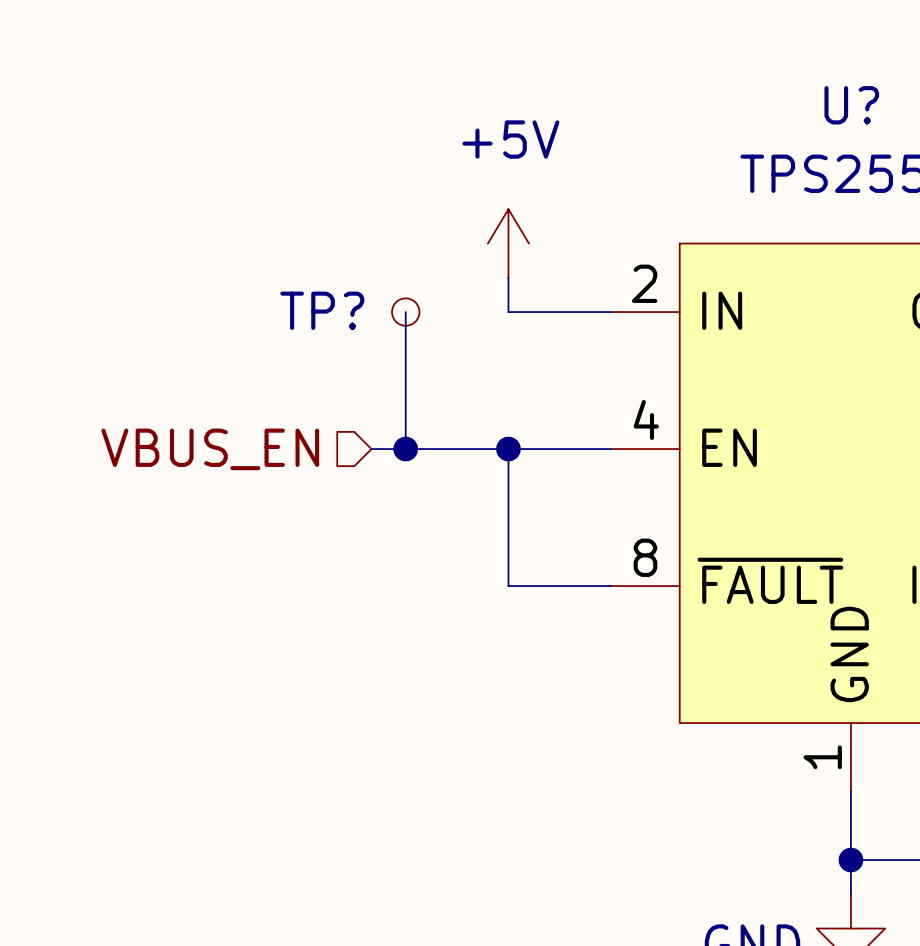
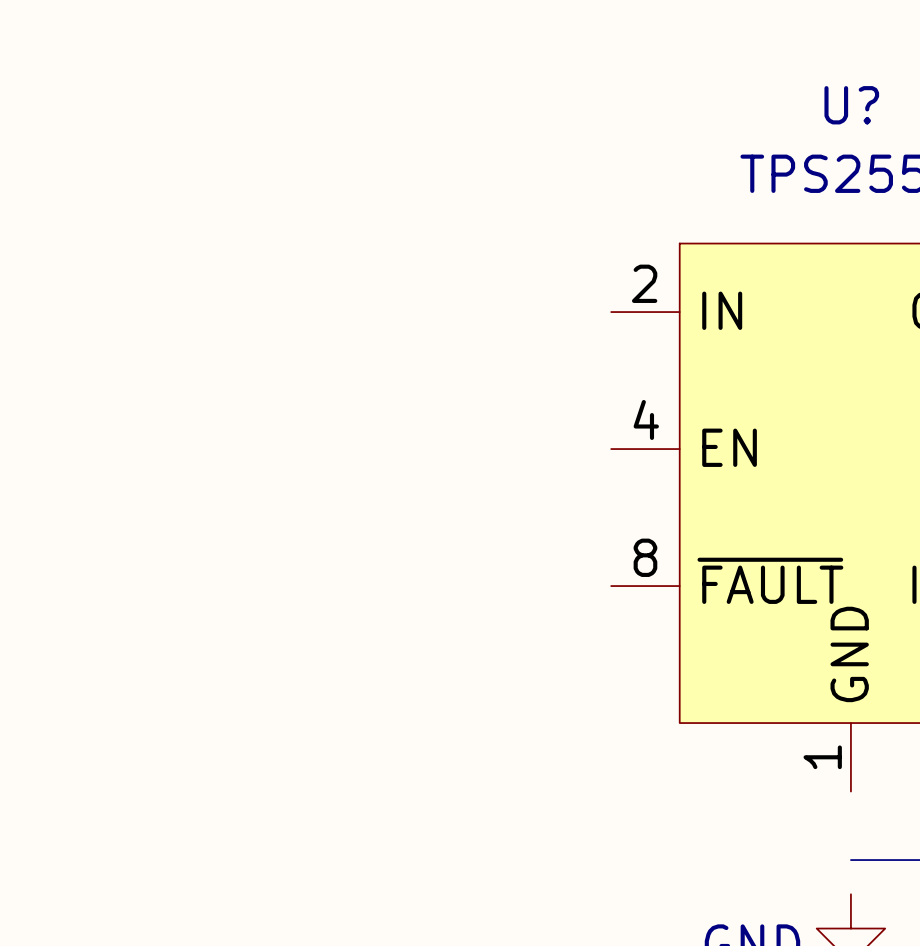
power symbol: +5V (508, 243) -> none
wire: (508, 277) (508, 312) (611, 312) -> none
wire: (405, 312) (405, 449) -> none
TP?: (405, 312) -> none
hierarchical label: VBUS_EN (210, 449) -> none
wire: (371, 449) (611, 449) -> none
junction: (405, 449) -> none
wire: (508, 449) (508, 586) (611, 586) -> none
junction: (508, 449) -> none
wire: (850, 791) (850, 894) -> none
junction: (850, 860) -> none

